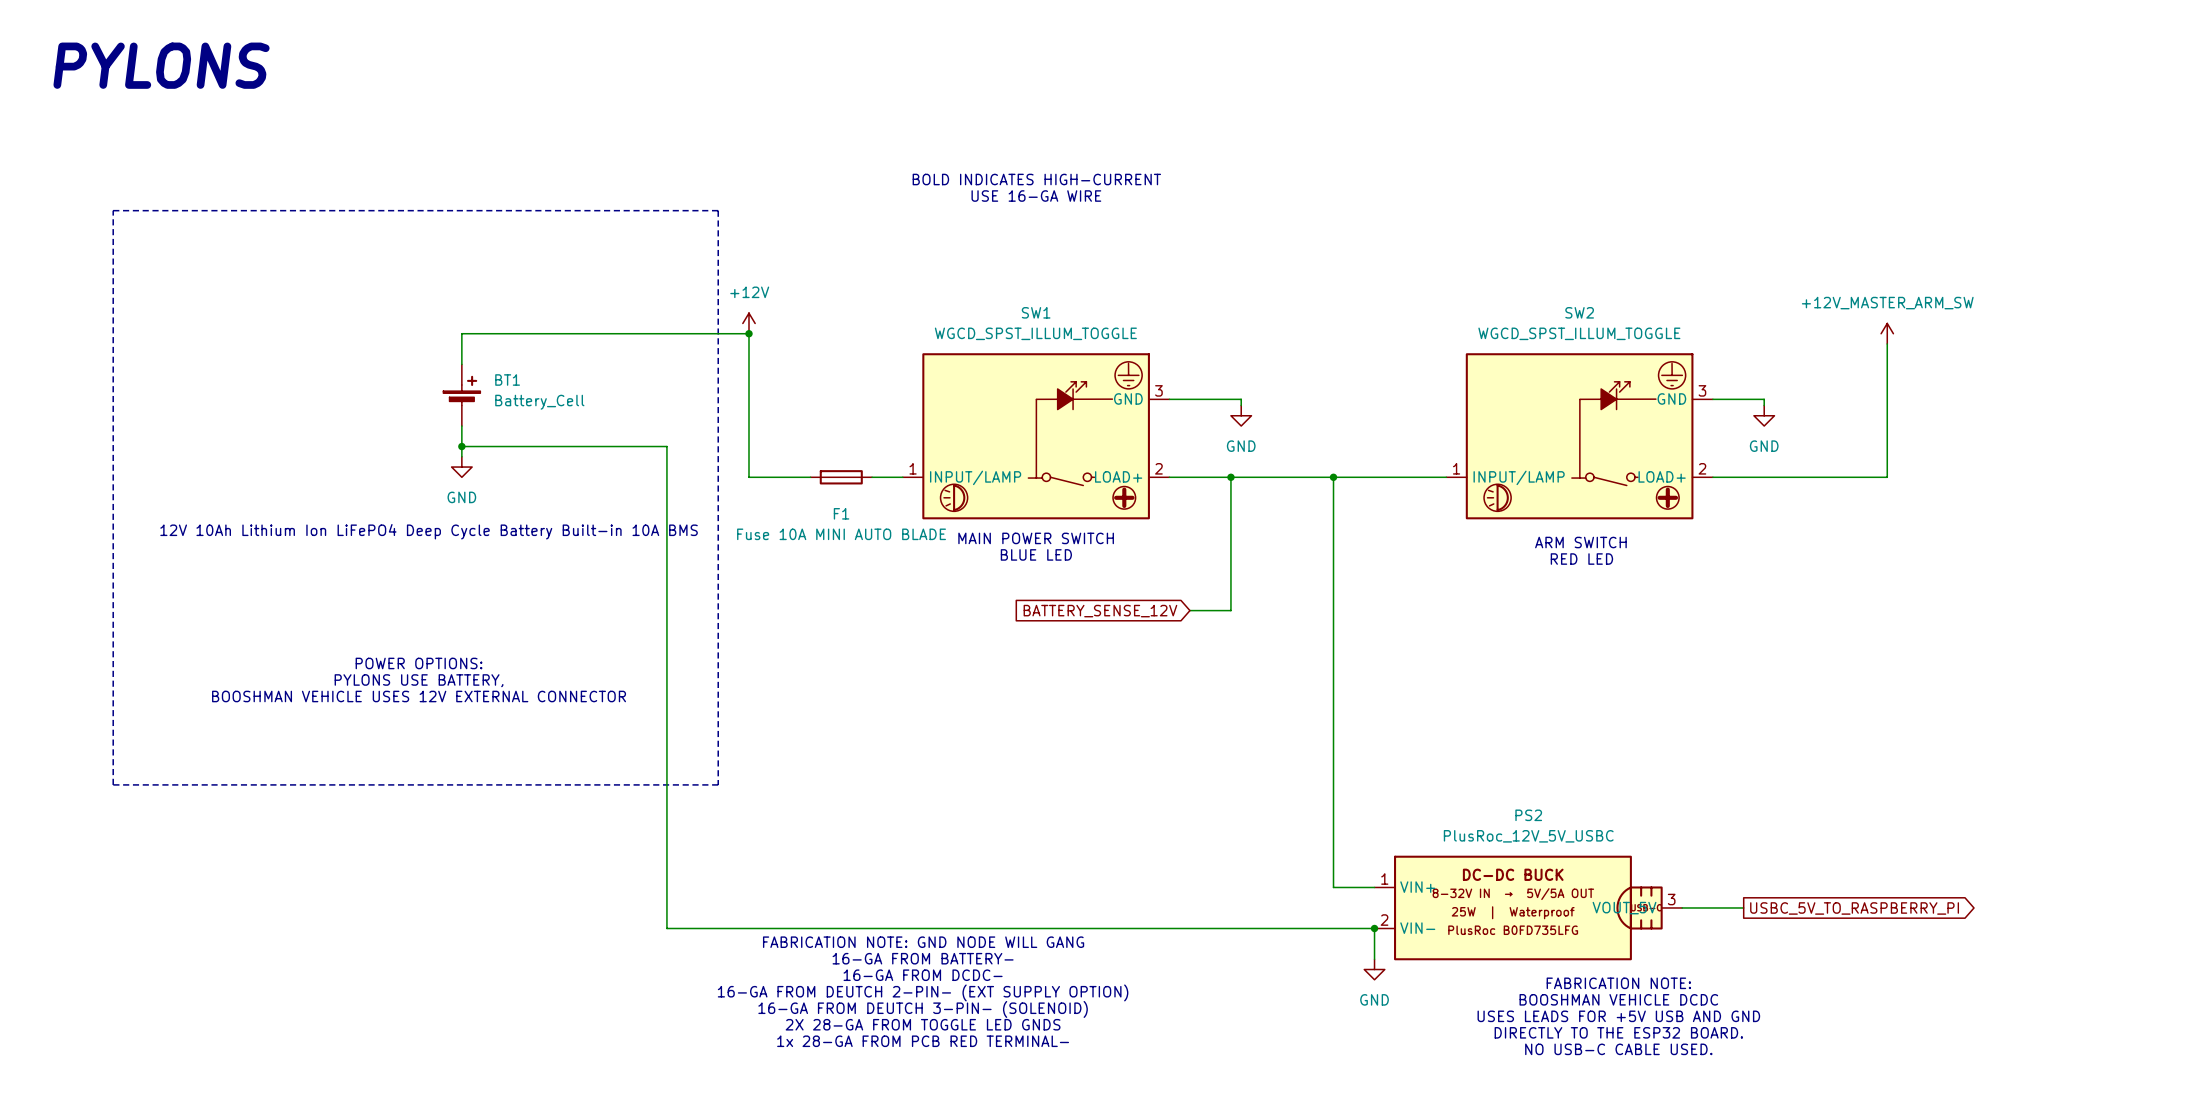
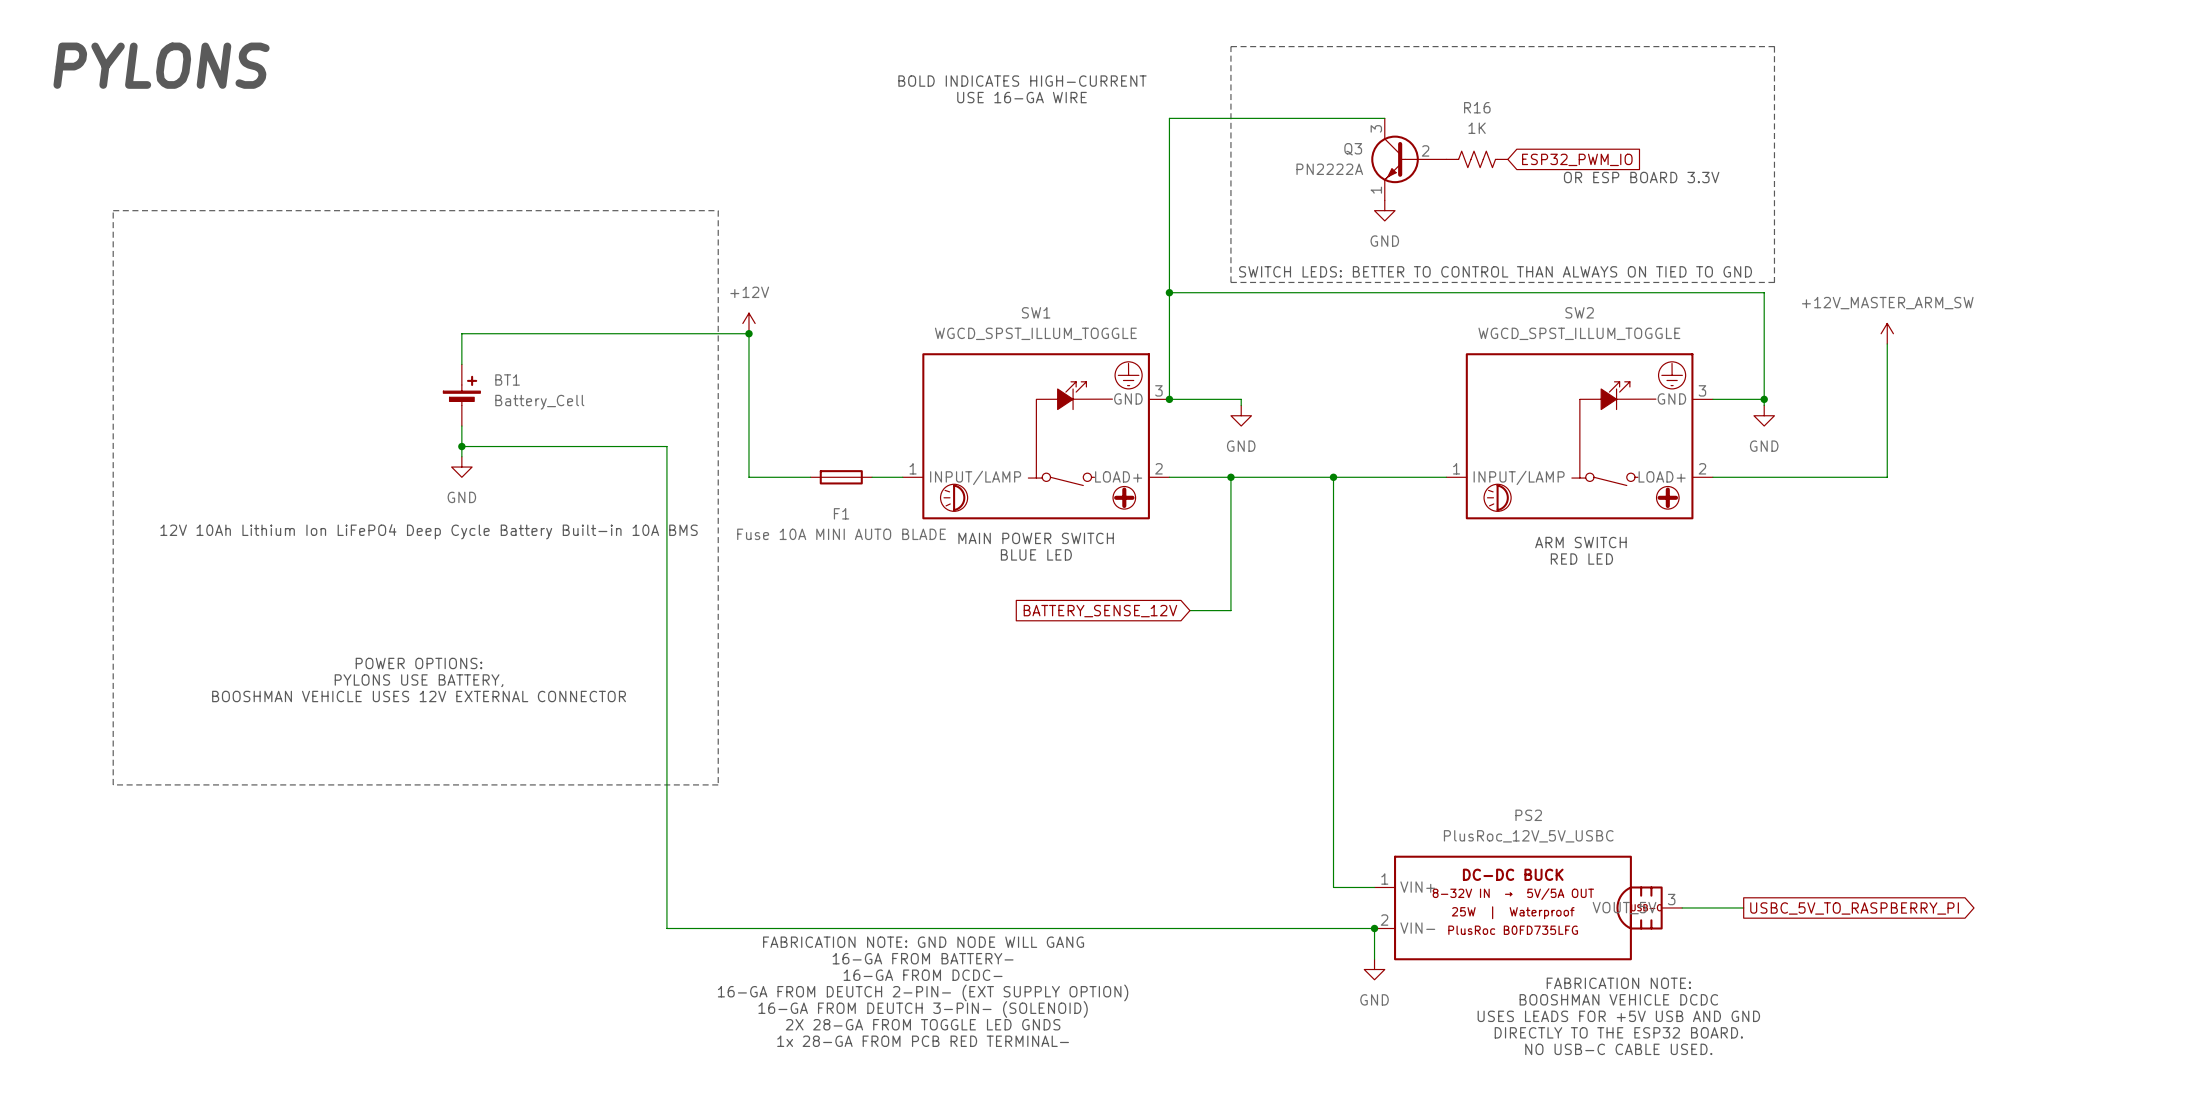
line: none -> (1230, 46) (1774, 46) (1774, 282) (1230, 282) (1230, 46)
wire: none -> (1384, 118) (1169, 118) (1169, 399)
Q3: none -> PN2222A (1408, 159)
R16: none -> 1K (1477, 159)
global label: none -> ESP32_PWM_IO (1577, 159)
text: none -> OR ESP BOARD 3.3V (1641, 177)
text position: BOLD INDICATES HIGH-CURRENT (1036, 179) -> BOLD INDICATES HIGH-CURRENT (1022, 81)
text position: USE 16-GA WIRE (1036, 196) -> USE 16-GA WIRE (1022, 97)
power symbol: none -> GND (1384, 210)
text: none -> SWITCH LEDS: BETTER TO CONTROL THAN ALWAYS ON TIED TO GND (1495, 271)
wire: none -> (1169, 292) (1764, 292) (1764, 399)
junction: none -> (1169, 292)
junction: none -> (1169, 399)
junction: none -> (1764, 399)

